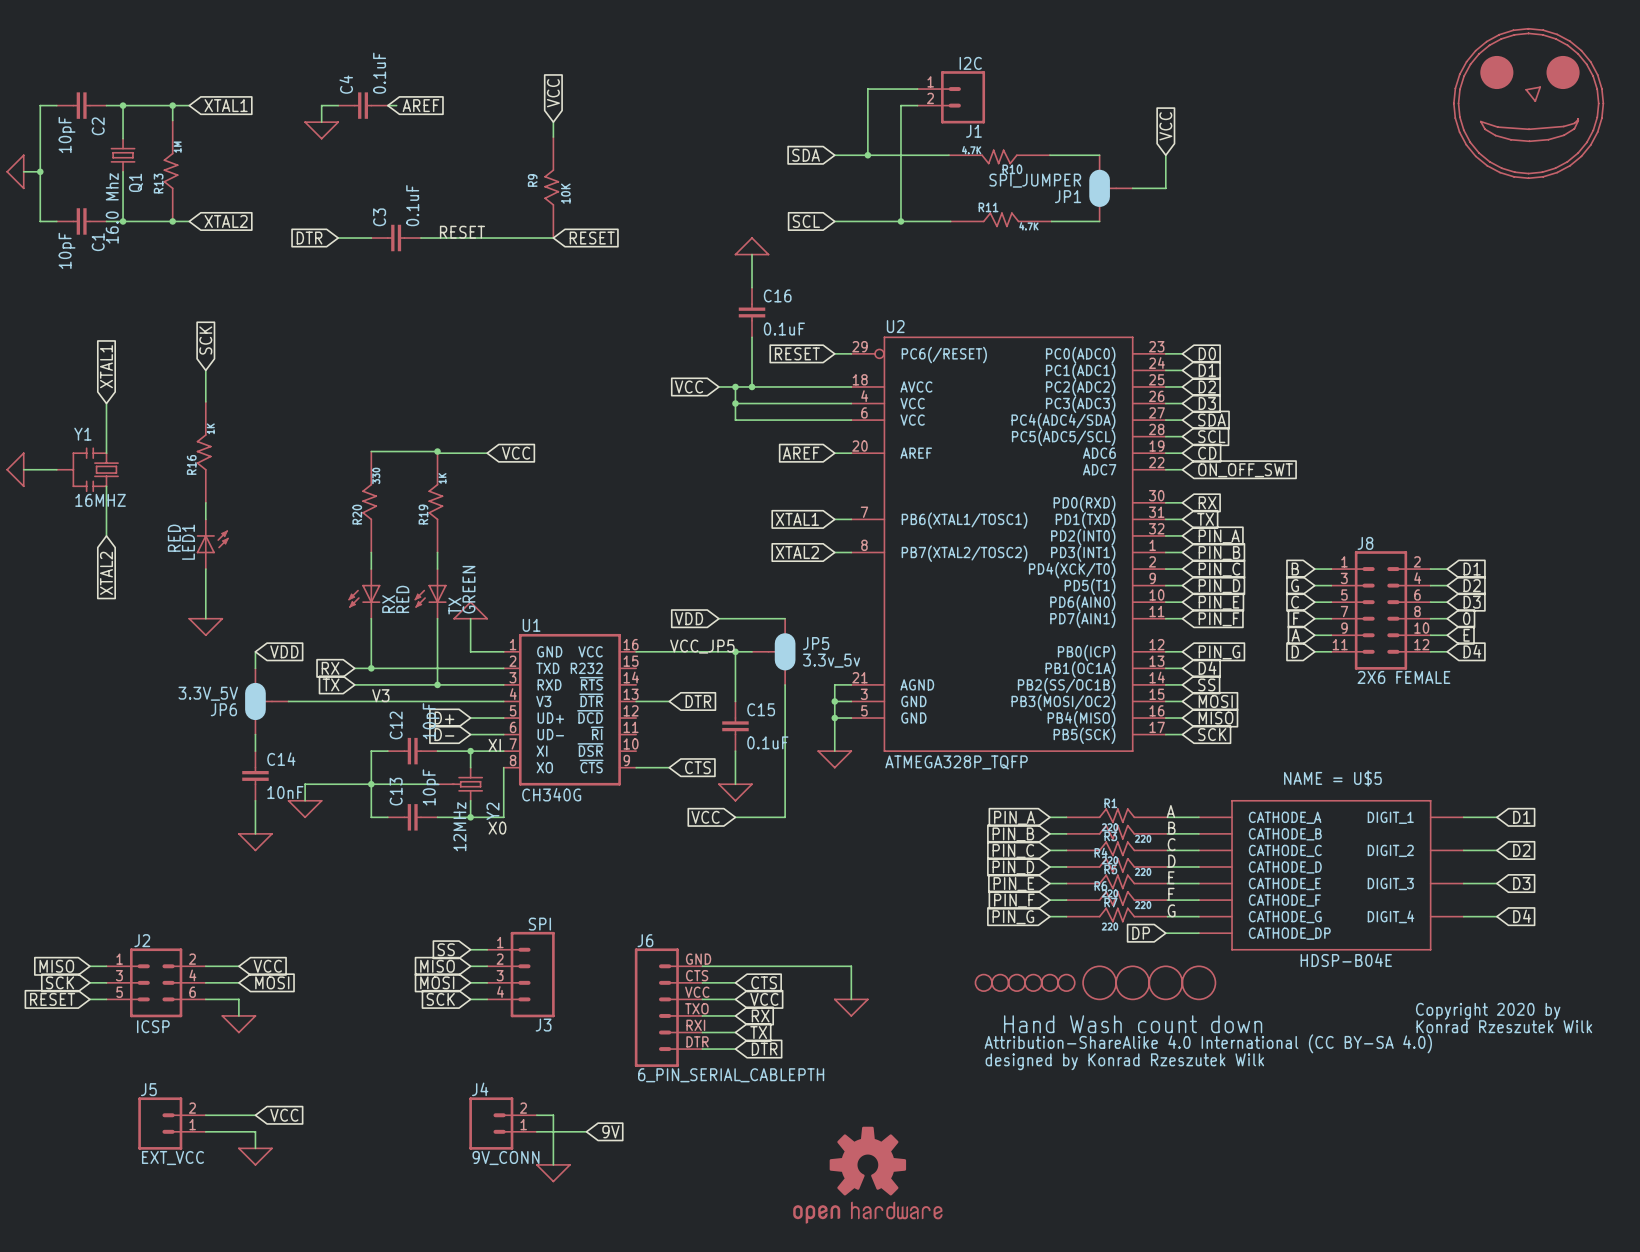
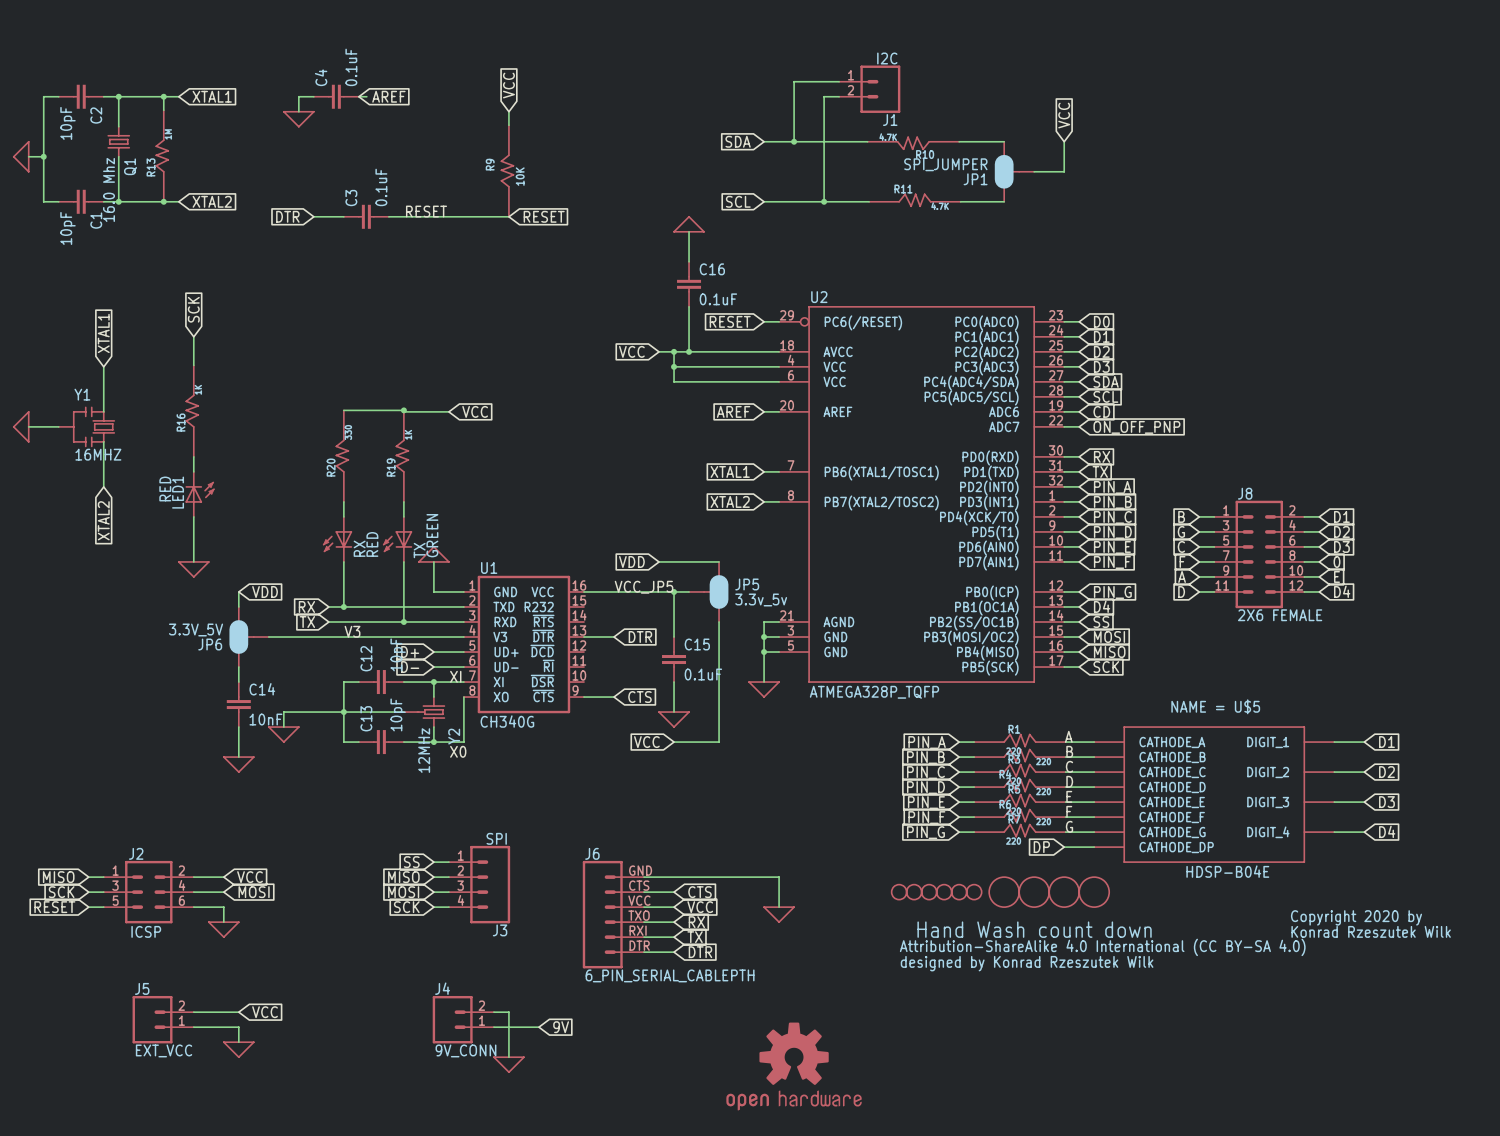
part: (1528, 103) -> none
global label: ON_OFF_SWT (1245, 470) -> ON_OFF_PNP (1136, 427)

